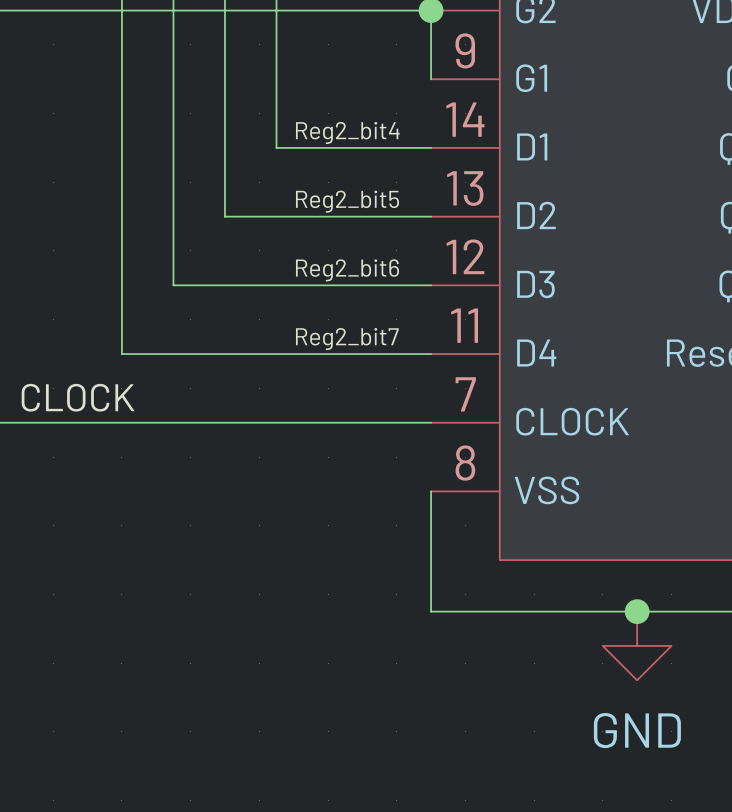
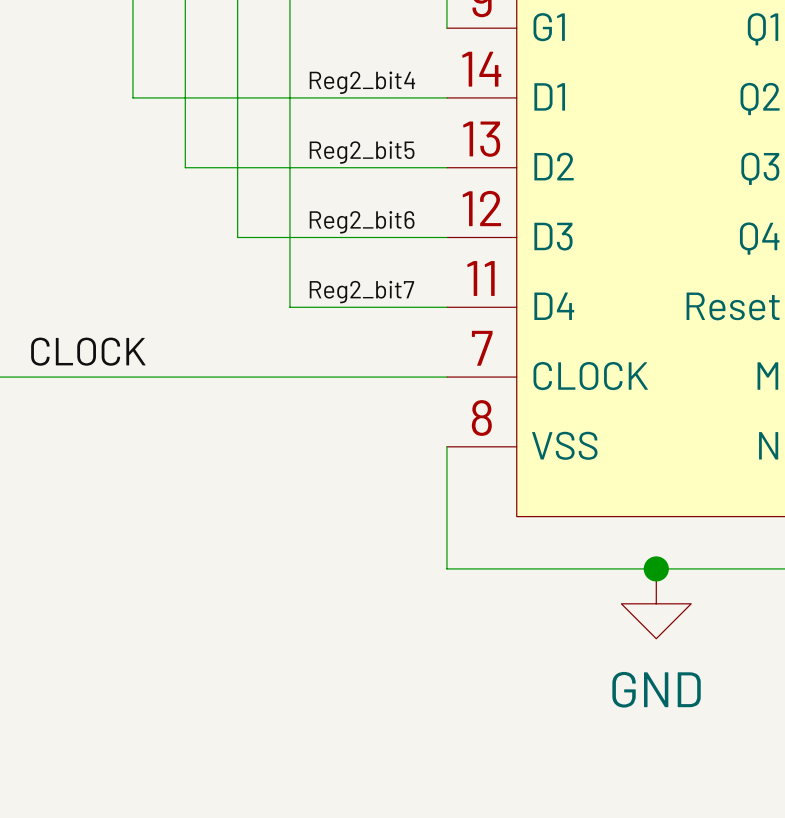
wire: (121, 147) (121, 354) (276, 354) -> (132, 97) (289, 97) (289, 307)
wire: (173, 216) (173, 285) (224, 285) -> (185, 167) (237, 167) (237, 237)

